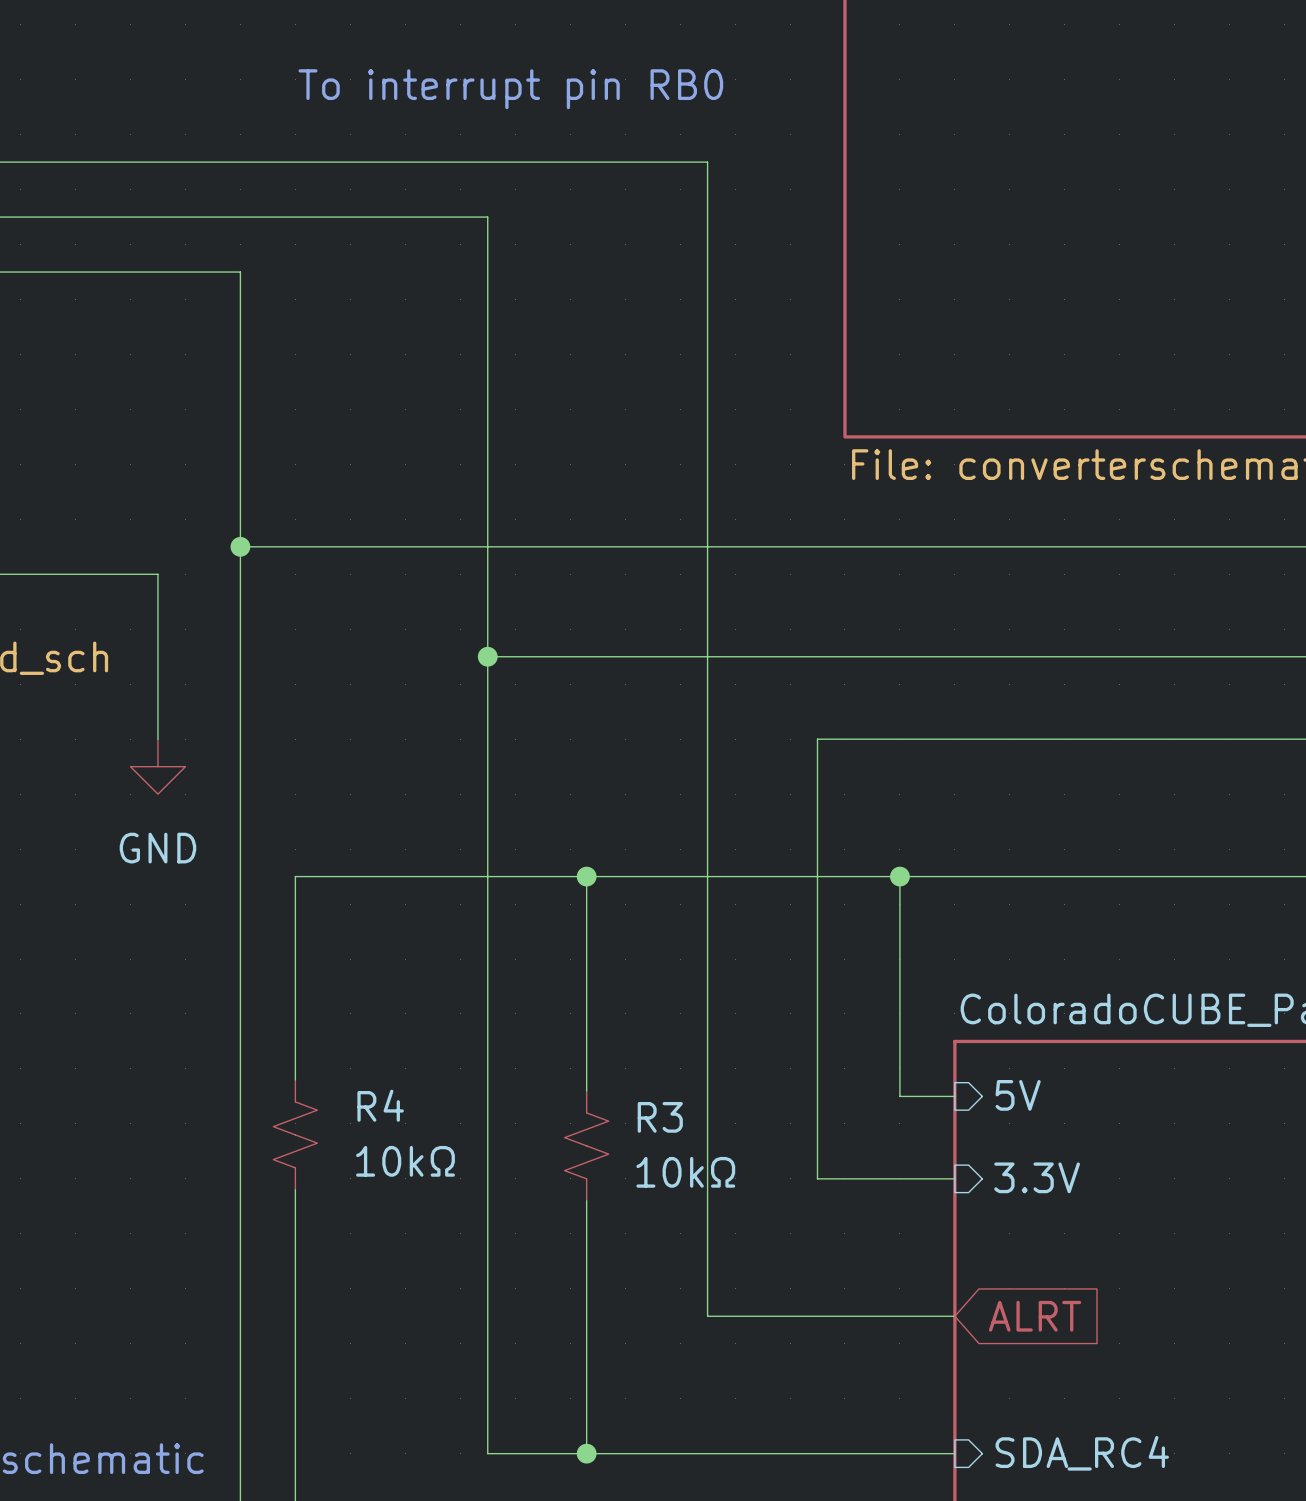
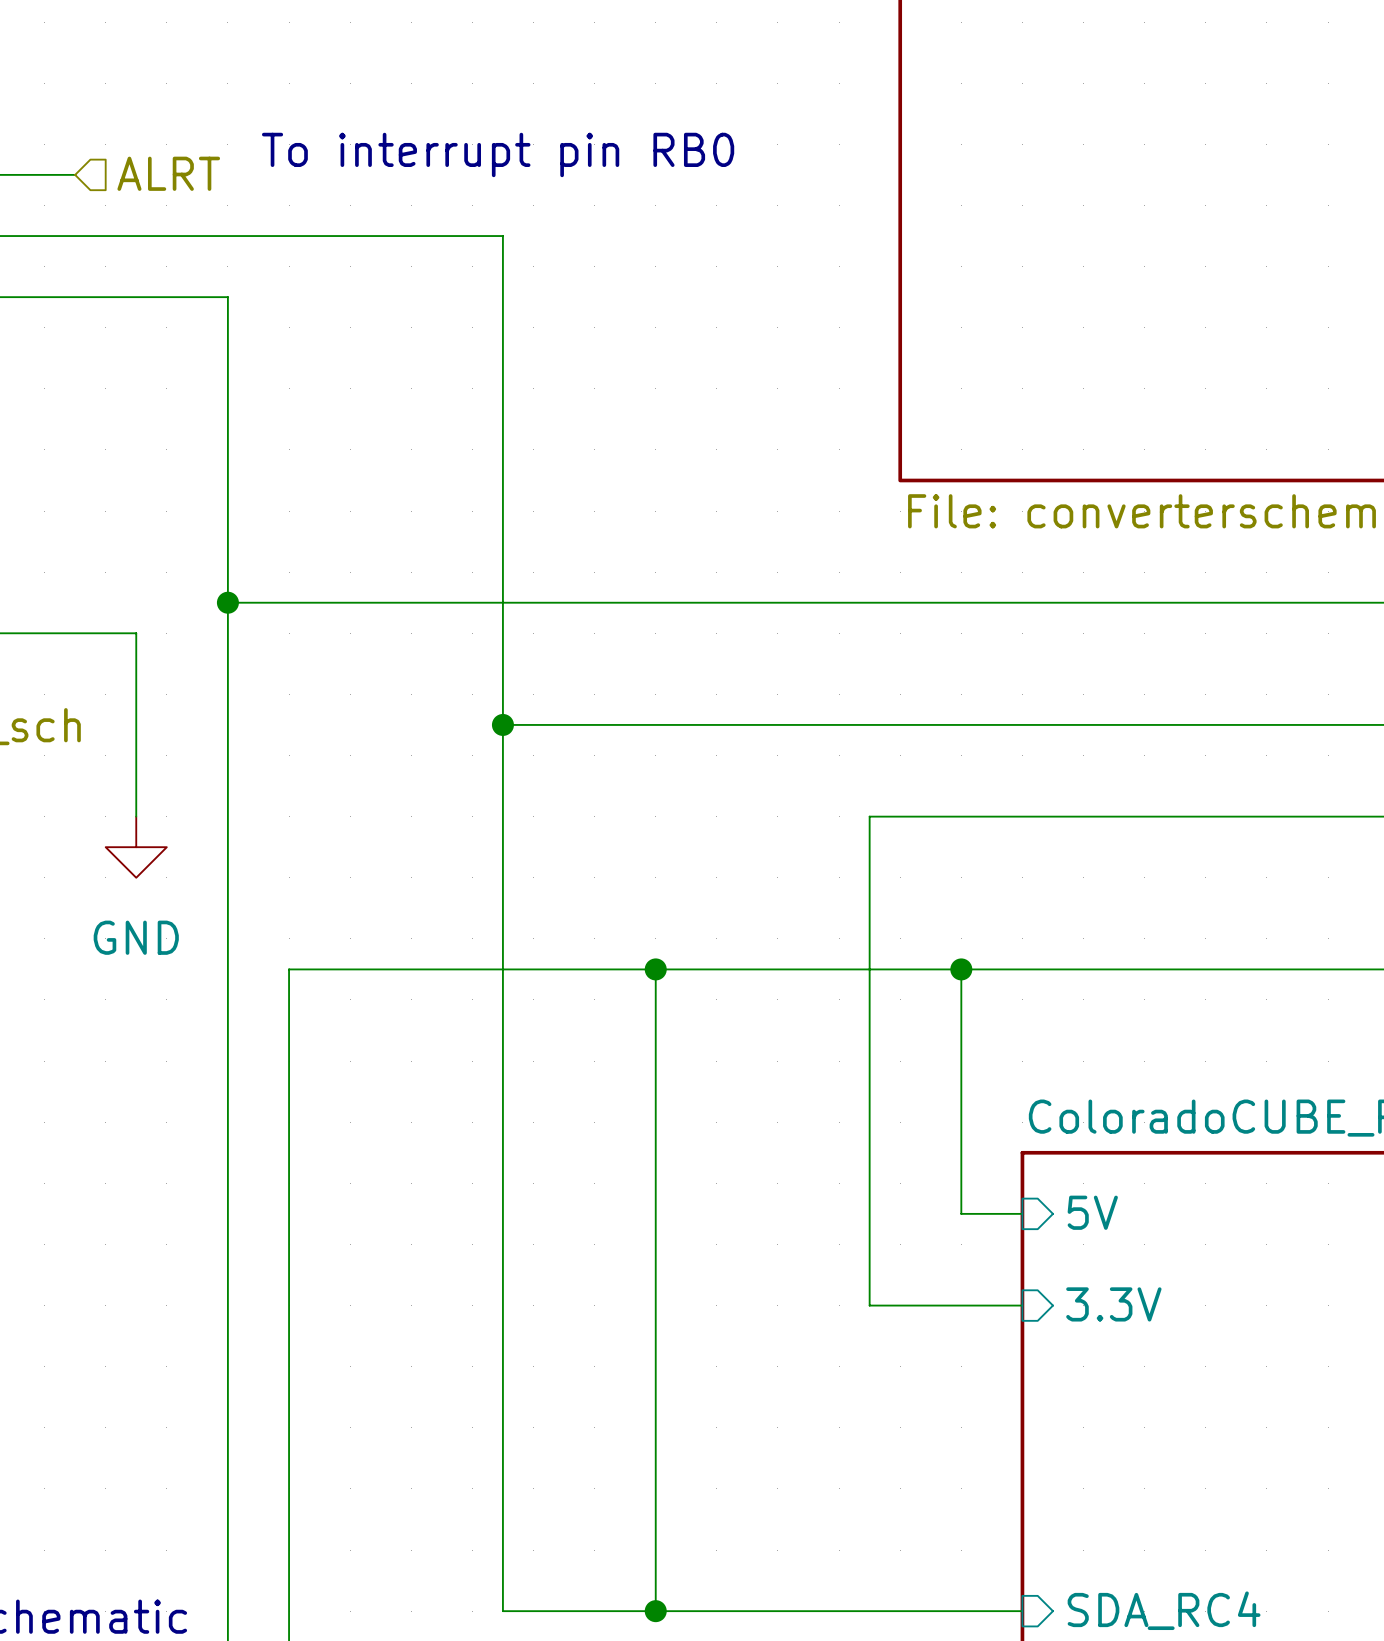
text position: To interrupt pin RB0 (510, 89) -> To interrupt pin RB0 (498, 154)
hierarchical label: none -> ALRT (168, 173)
wire: (103, 162) (707, 162) (707, 1316) (954, 1316) -> none
wire: (586, 876) (586, 1090) -> none
junction position: (586, 876) -> (655, 969)
wire: none -> (655, 969) (655, 1611)
wire: none -> (289, 1195) (289, 1317)
R4: 10kΩ (295, 1134) -> none
R3: 10kΩ (586, 1145) -> none
wire: (586, 1200) (586, 1453) -> none
global label: ALRT (1035, 1316) -> none
junction position: (586, 1453) -> (655, 1611)

